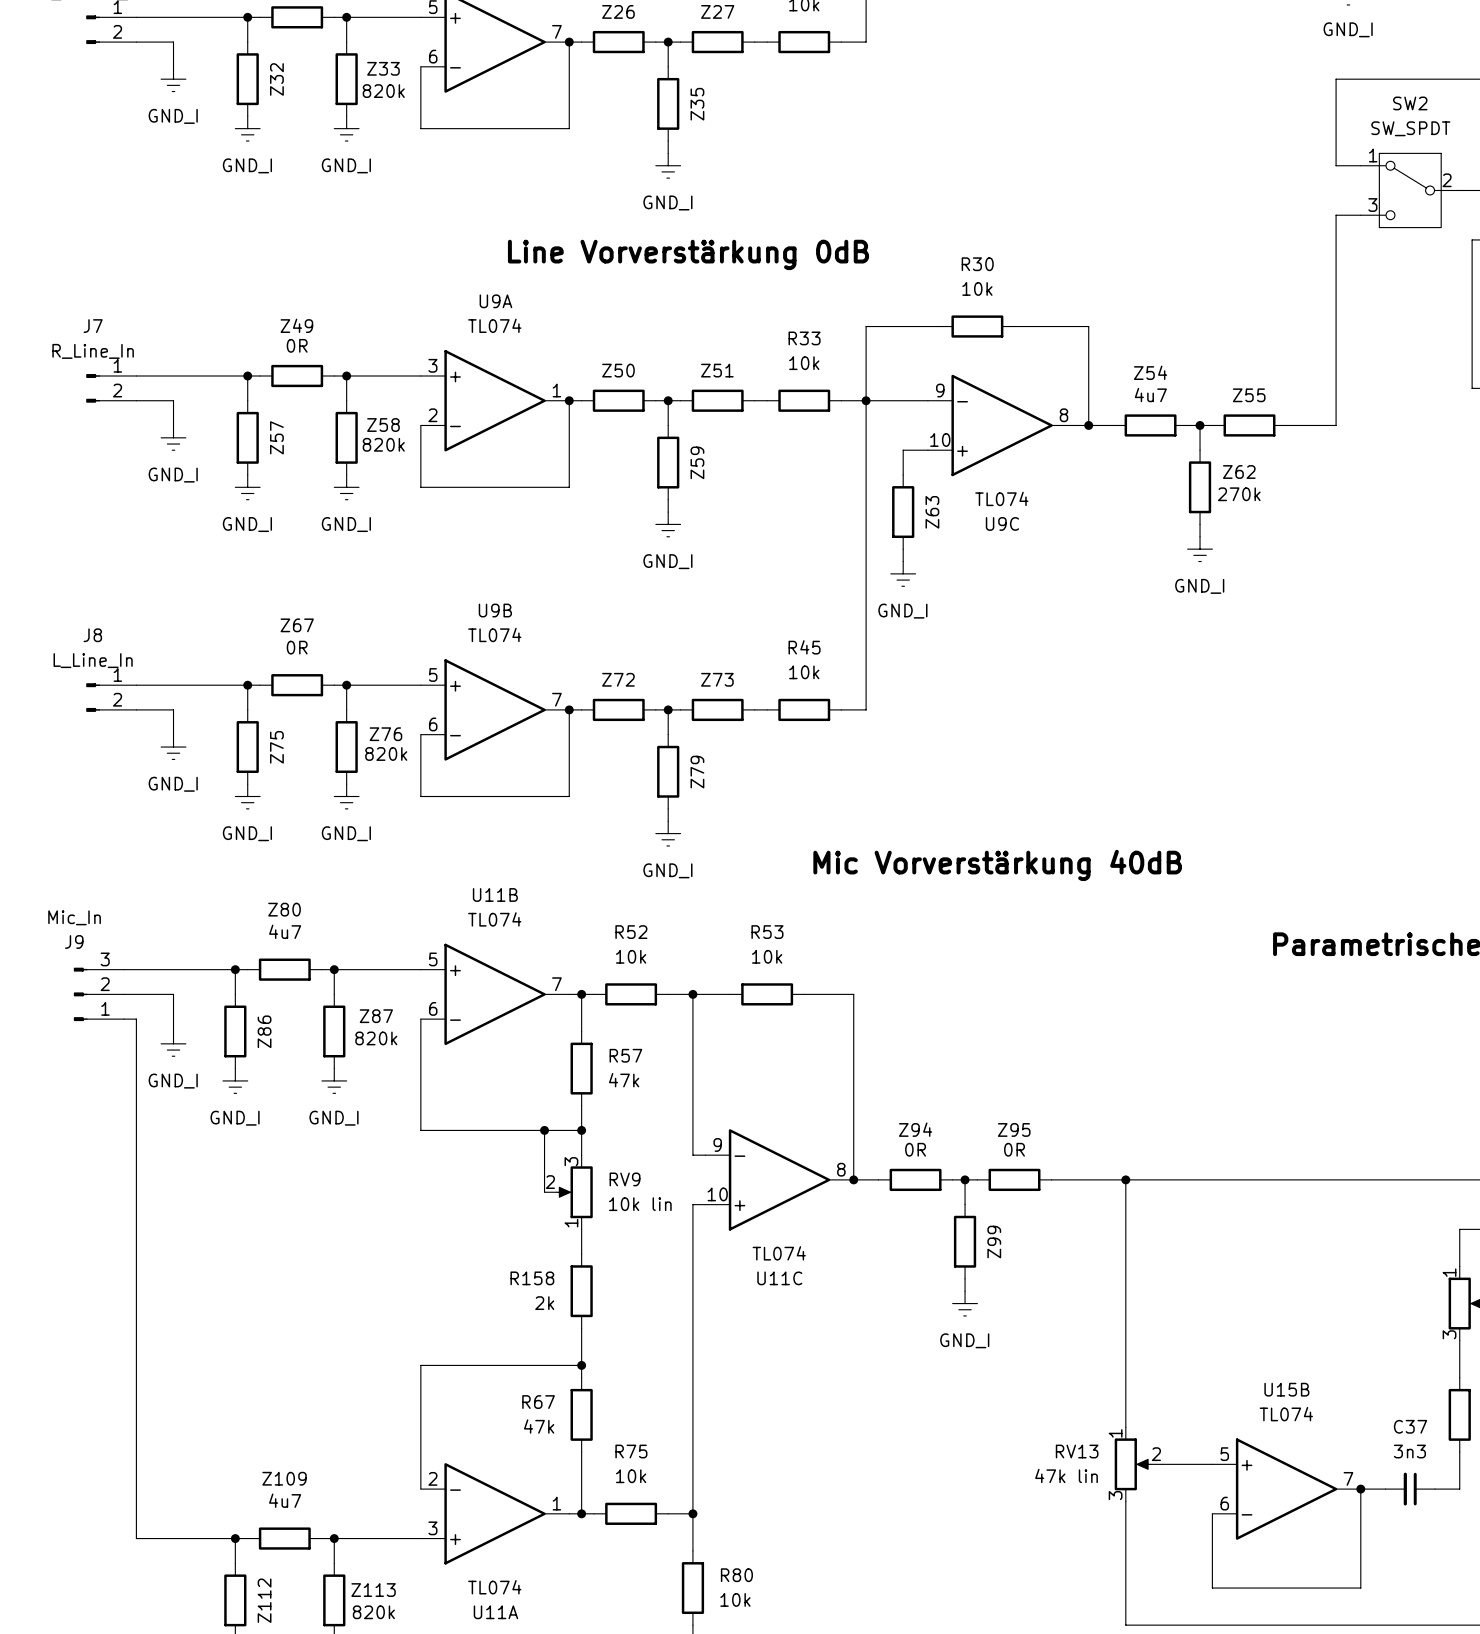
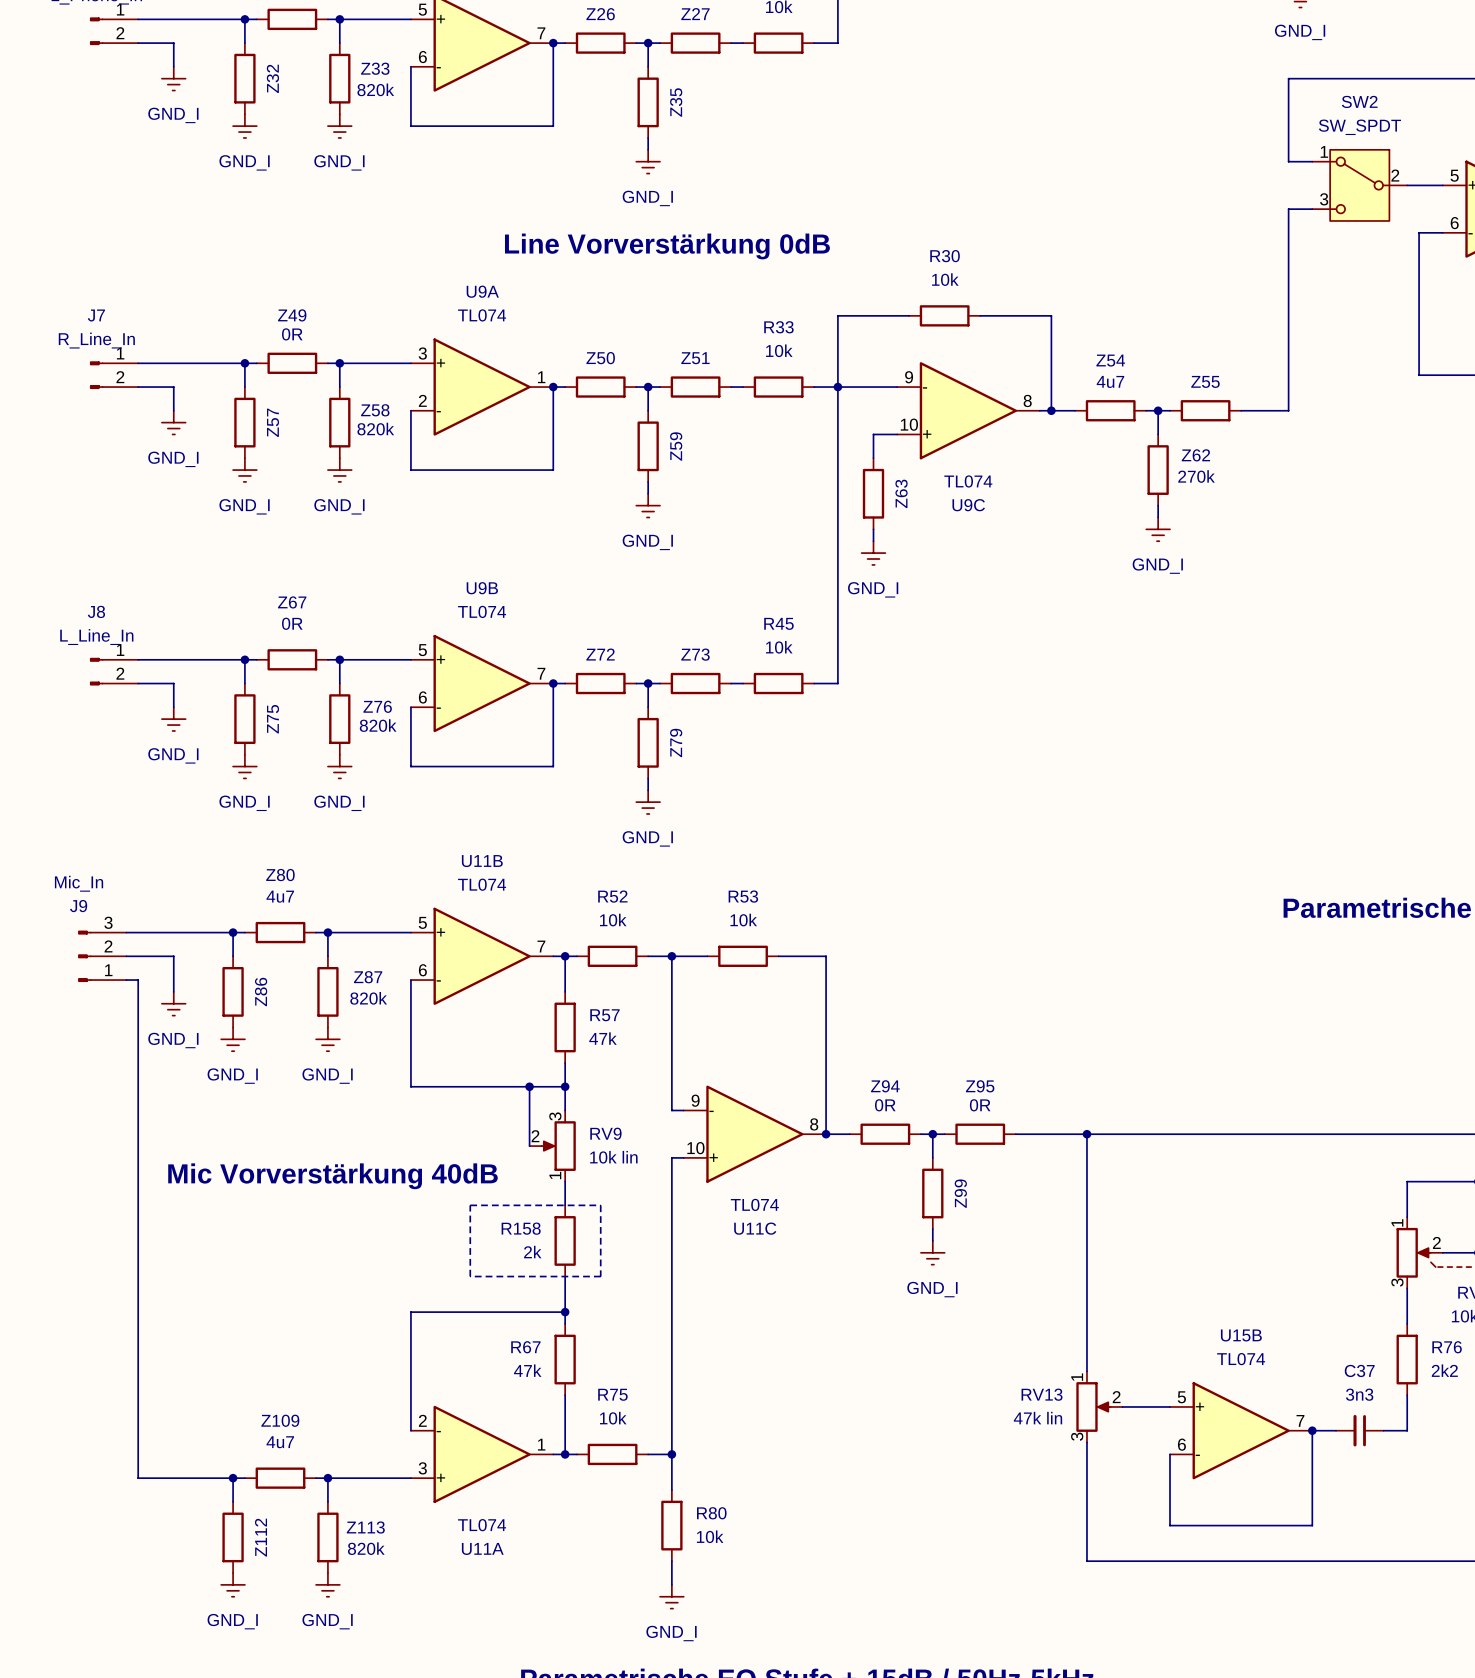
text: Mic Vorverstärkung 40dB (997, 865) -> none
text: none -> Mic Vorverstärkung 40dB (332, 1176)
line: none -> (470, 1205) (600, 1205) (600, 1276) (470, 1276) (470, 1205)

